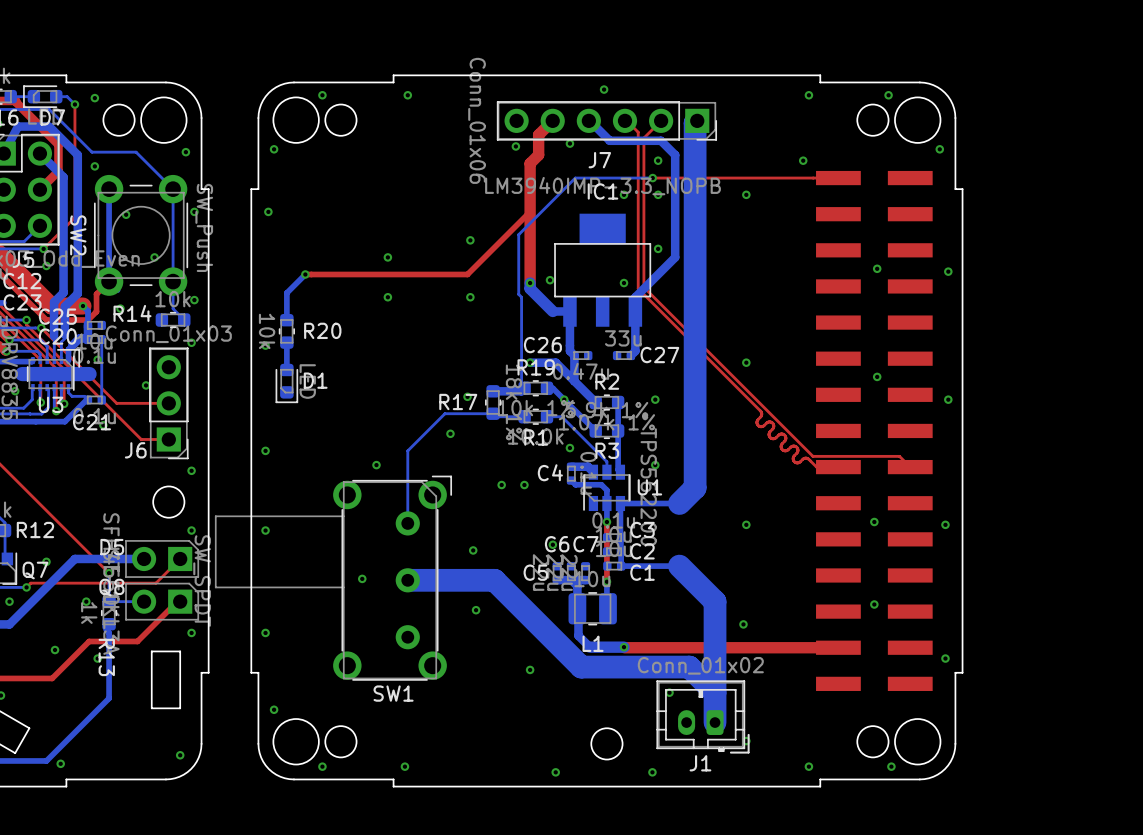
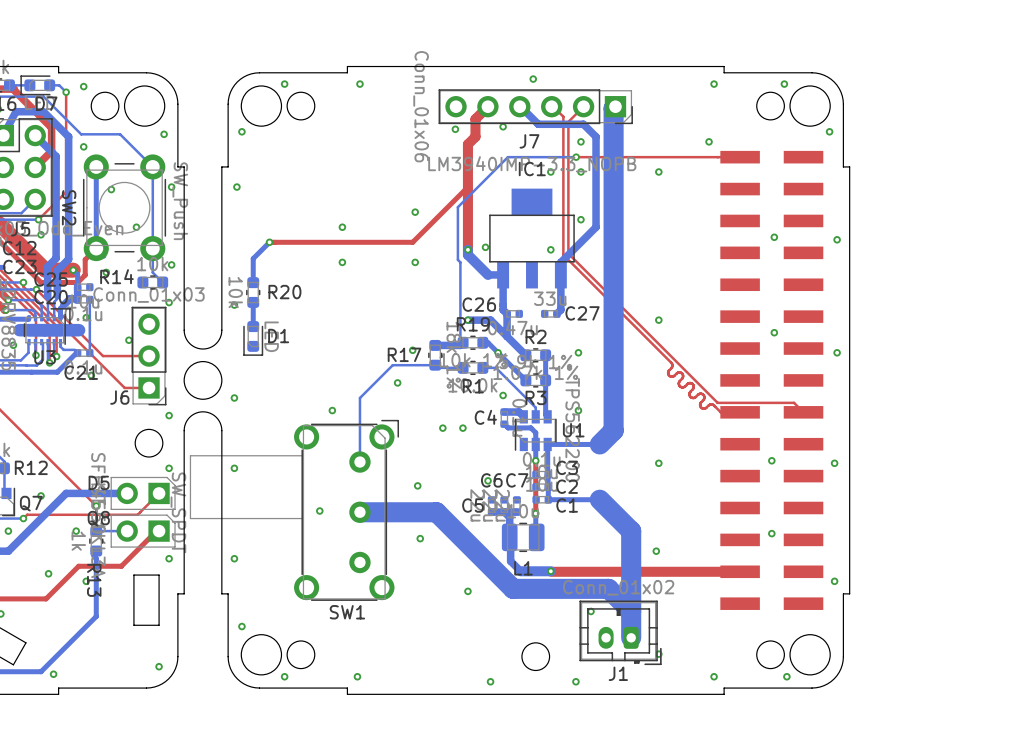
board edge: (208, 374) (208, 487) -> (221, 430) (216, 417) (203, 411) (189, 417) (184, 430)
board edge: (251, 374) (251, 487) -> (221, 330) (216, 343) (203, 349) (189, 343) (184, 330)
round board edge: none -> [183, 361, 223, 400]

